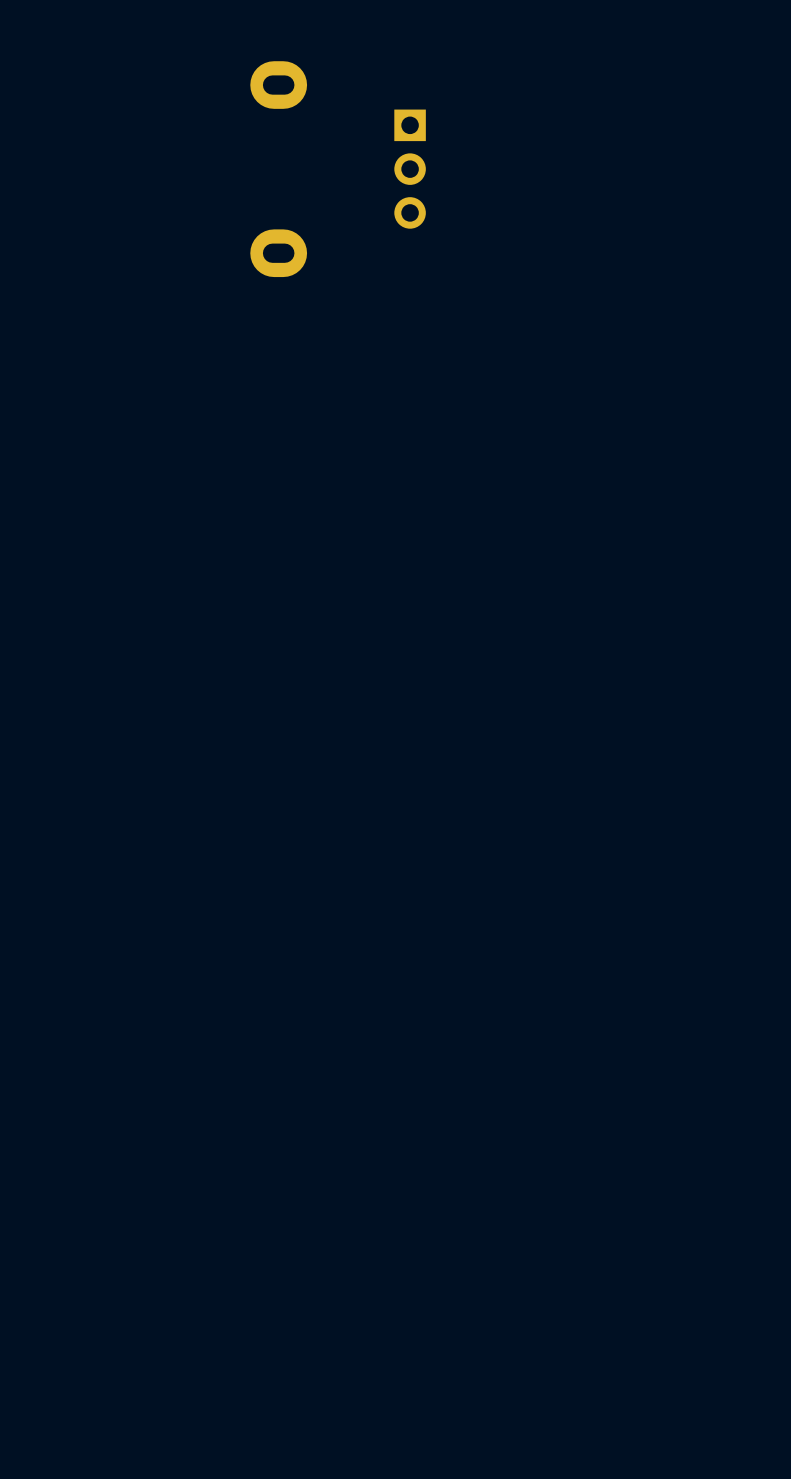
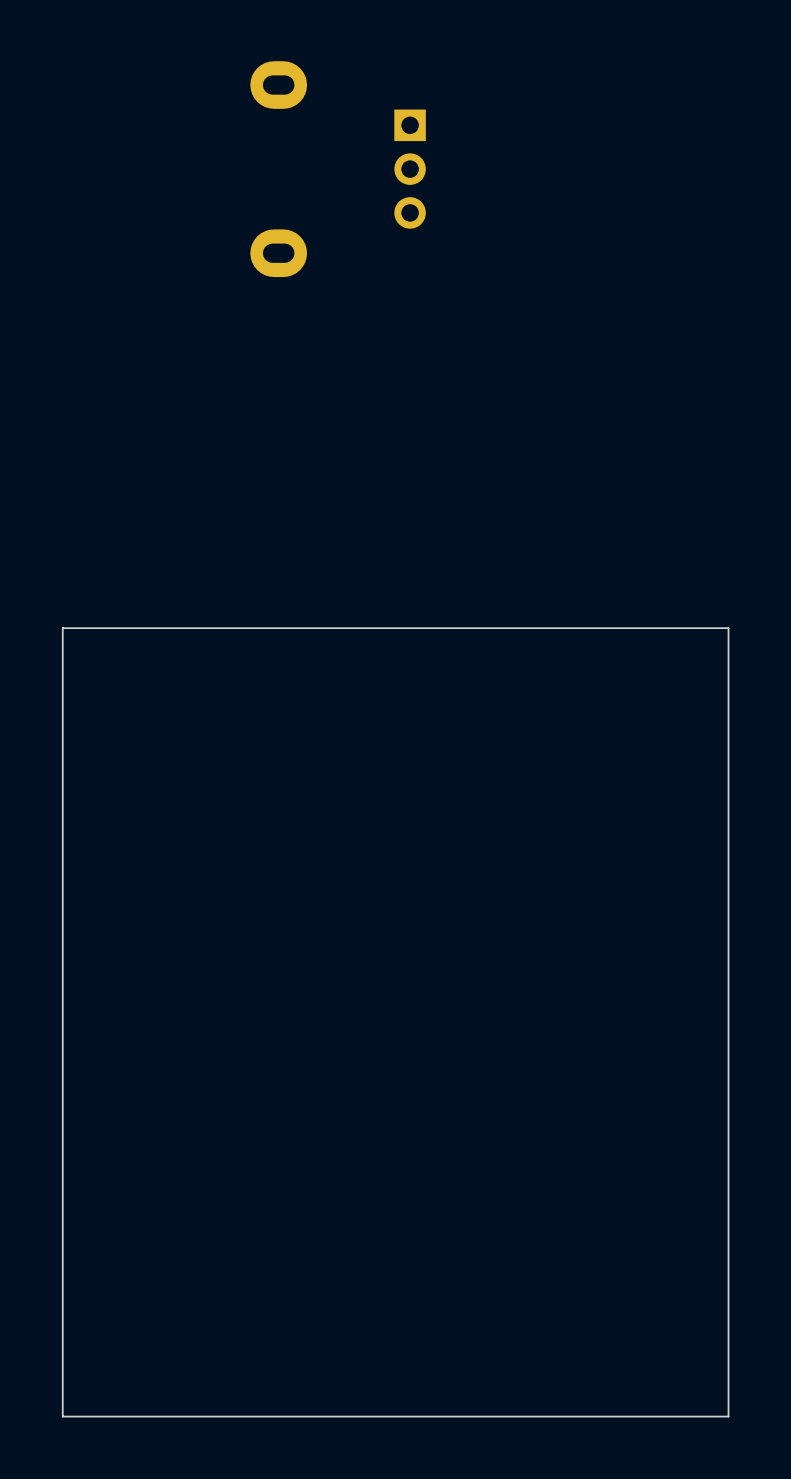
board edge: none -> (728, 628) (62, 628) (62, 1416) (728, 1416) (728, 628)

